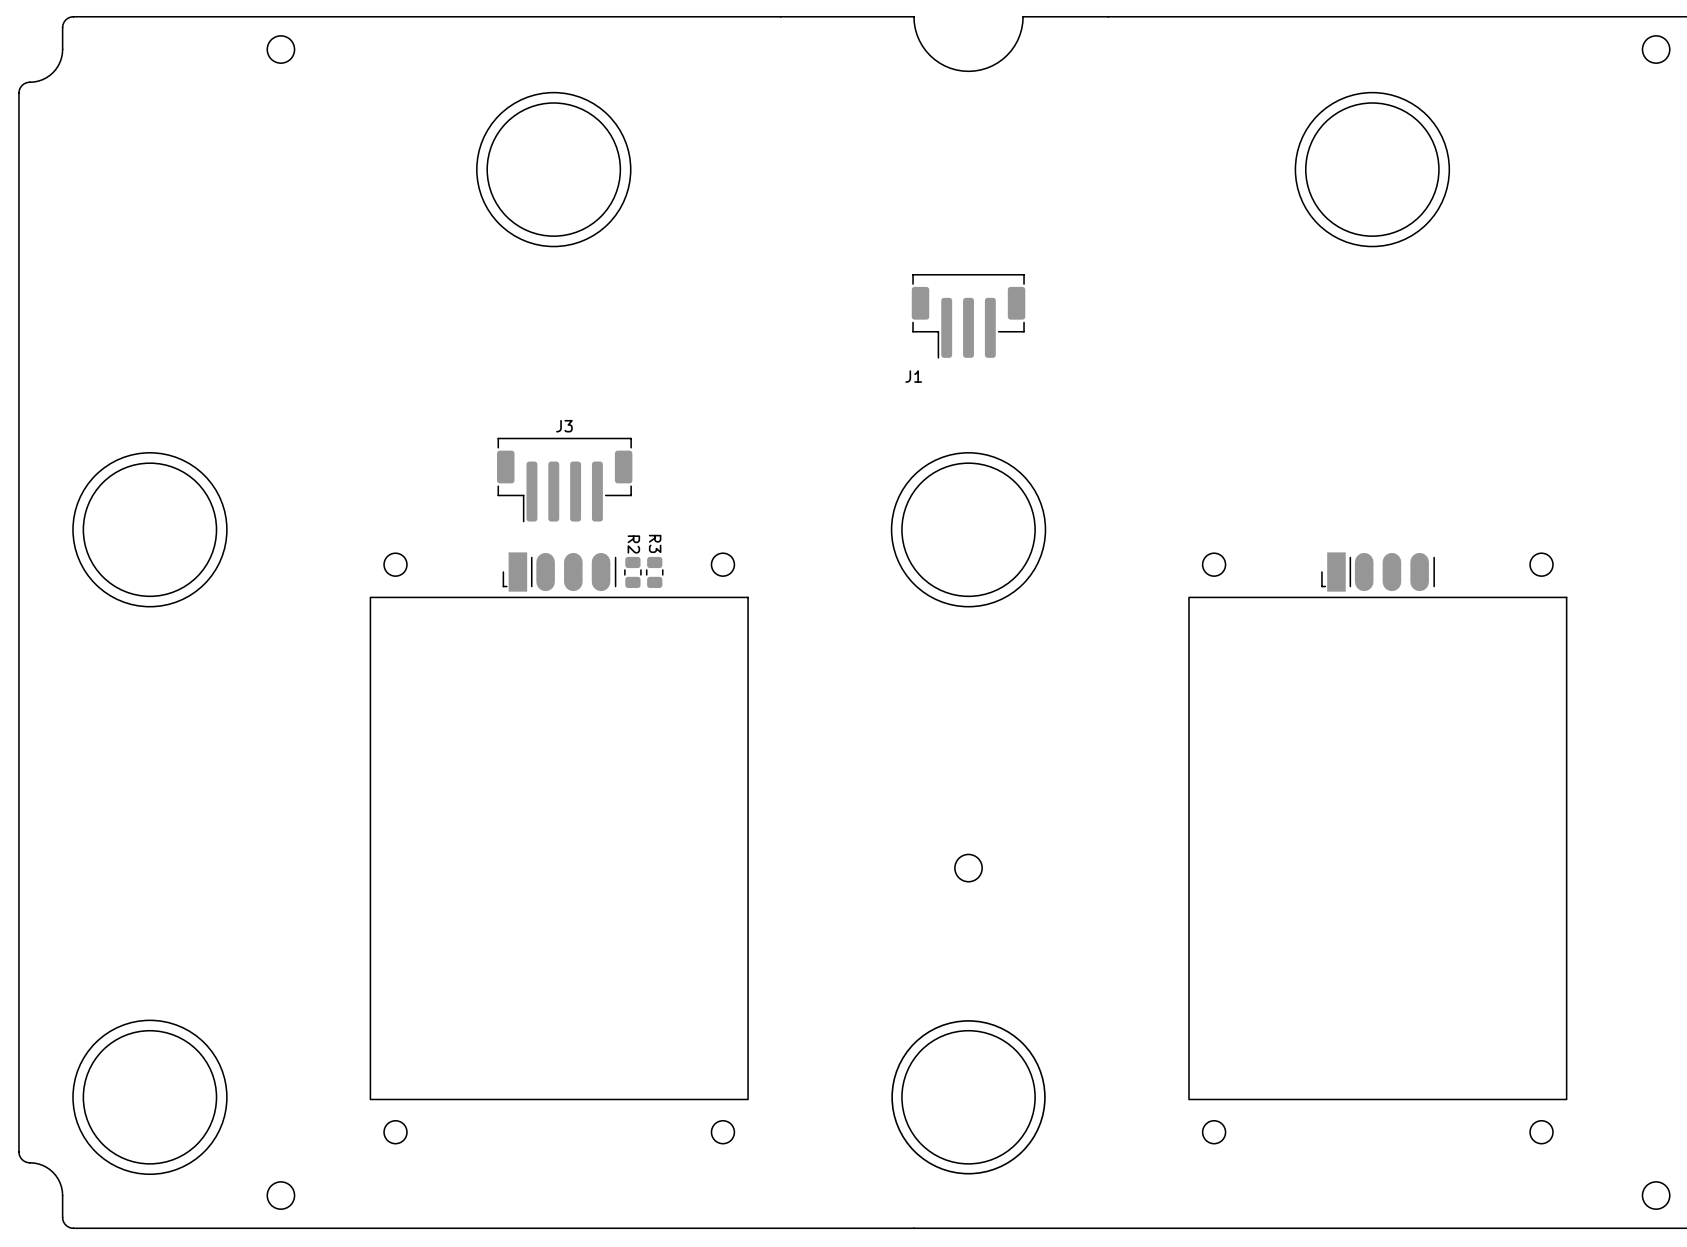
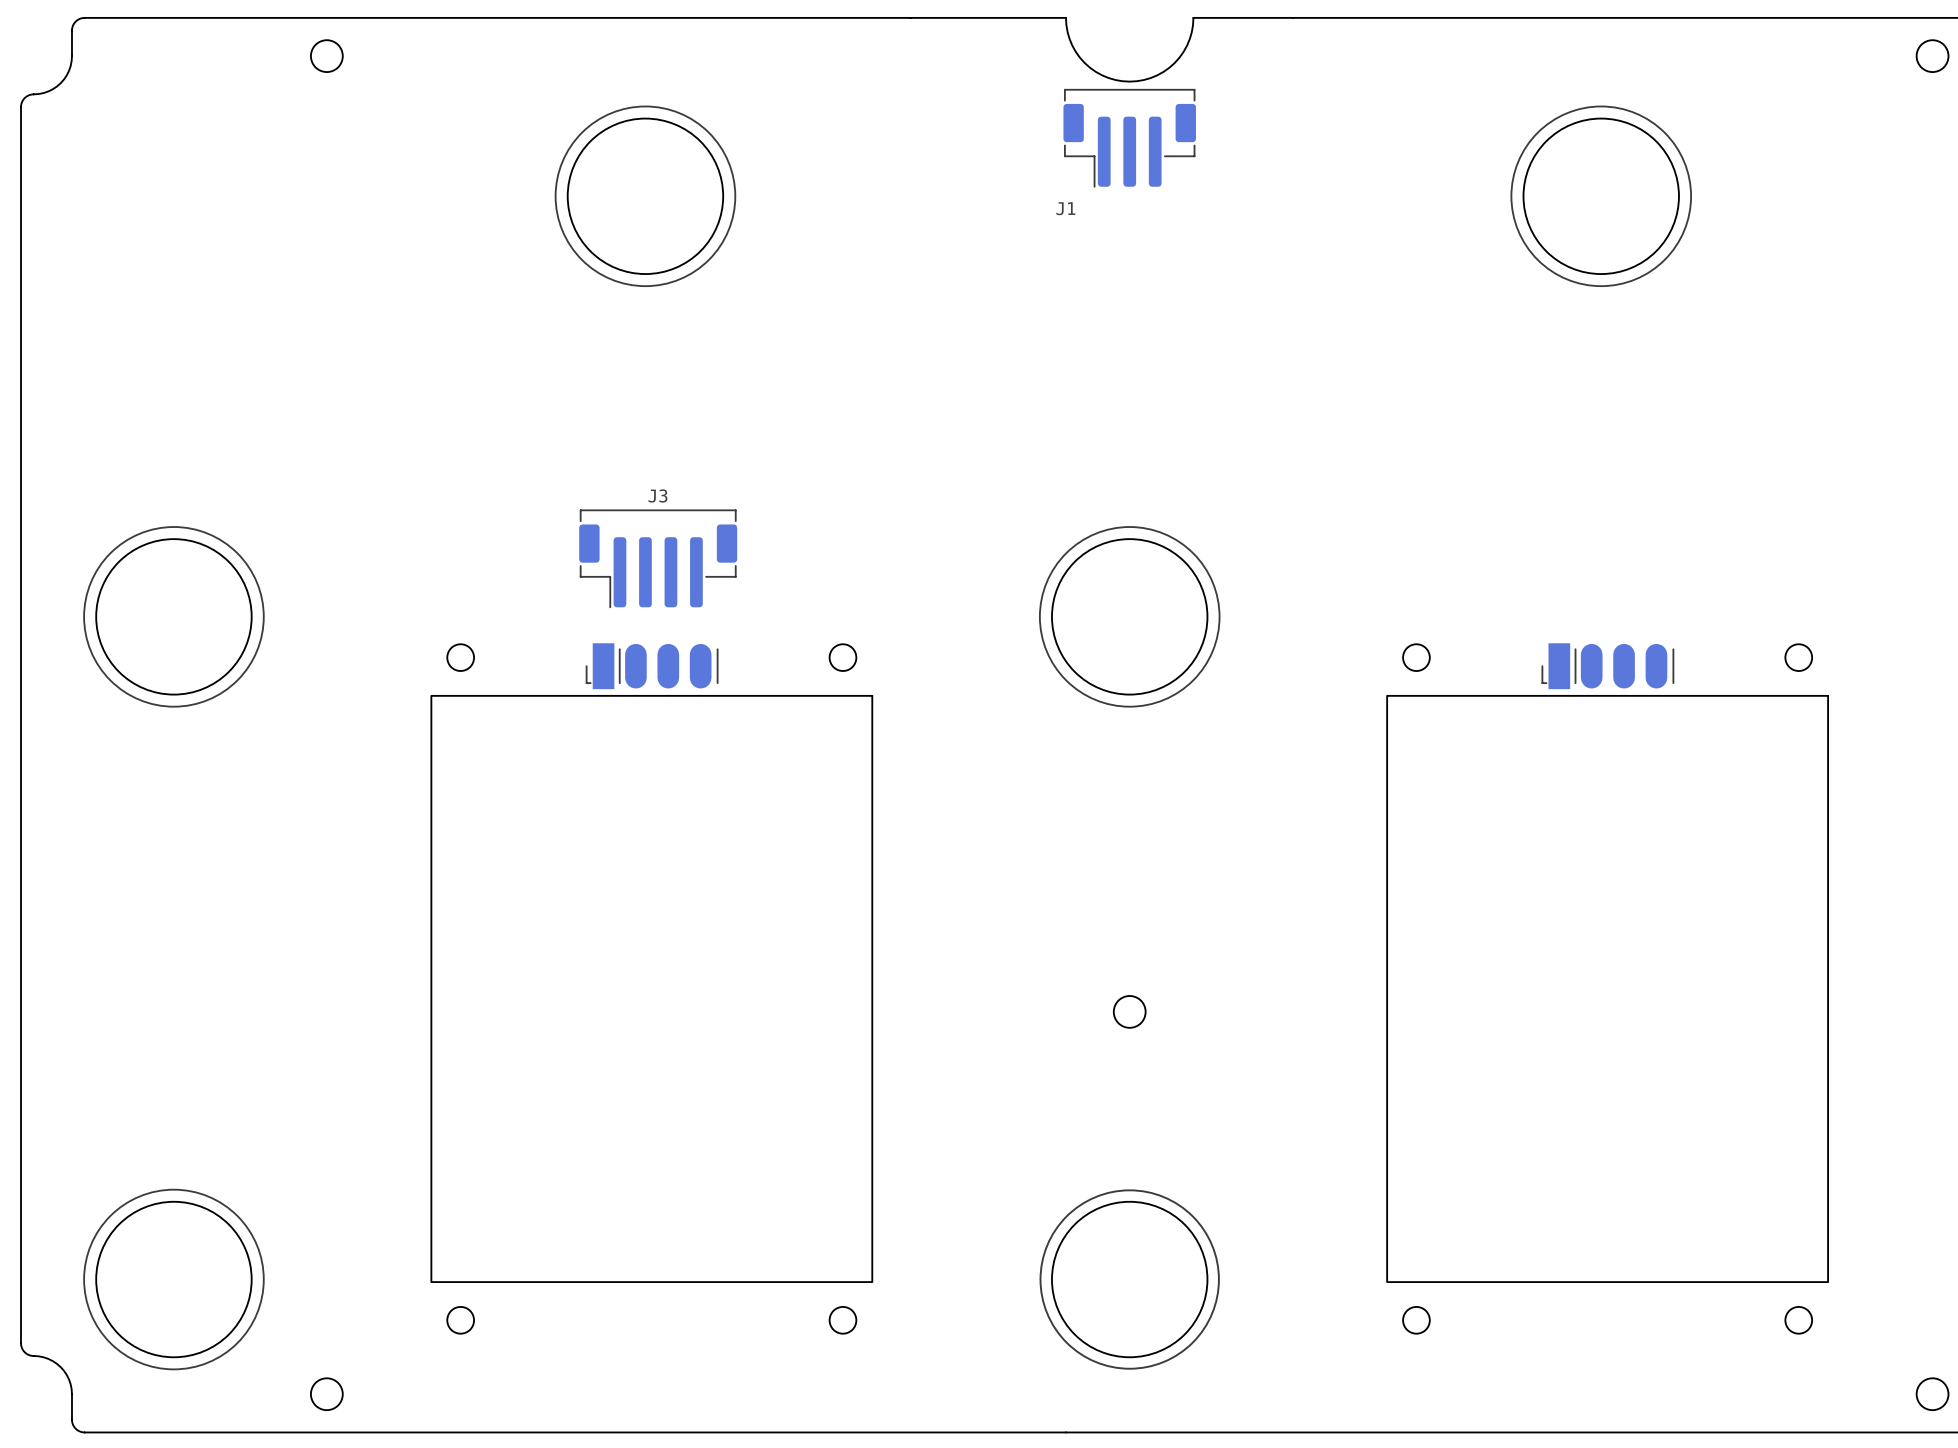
J1 position: (968, 316) -> (1129, 138)
R2: (632, 572) -> none
R3: (654, 572) -> none

